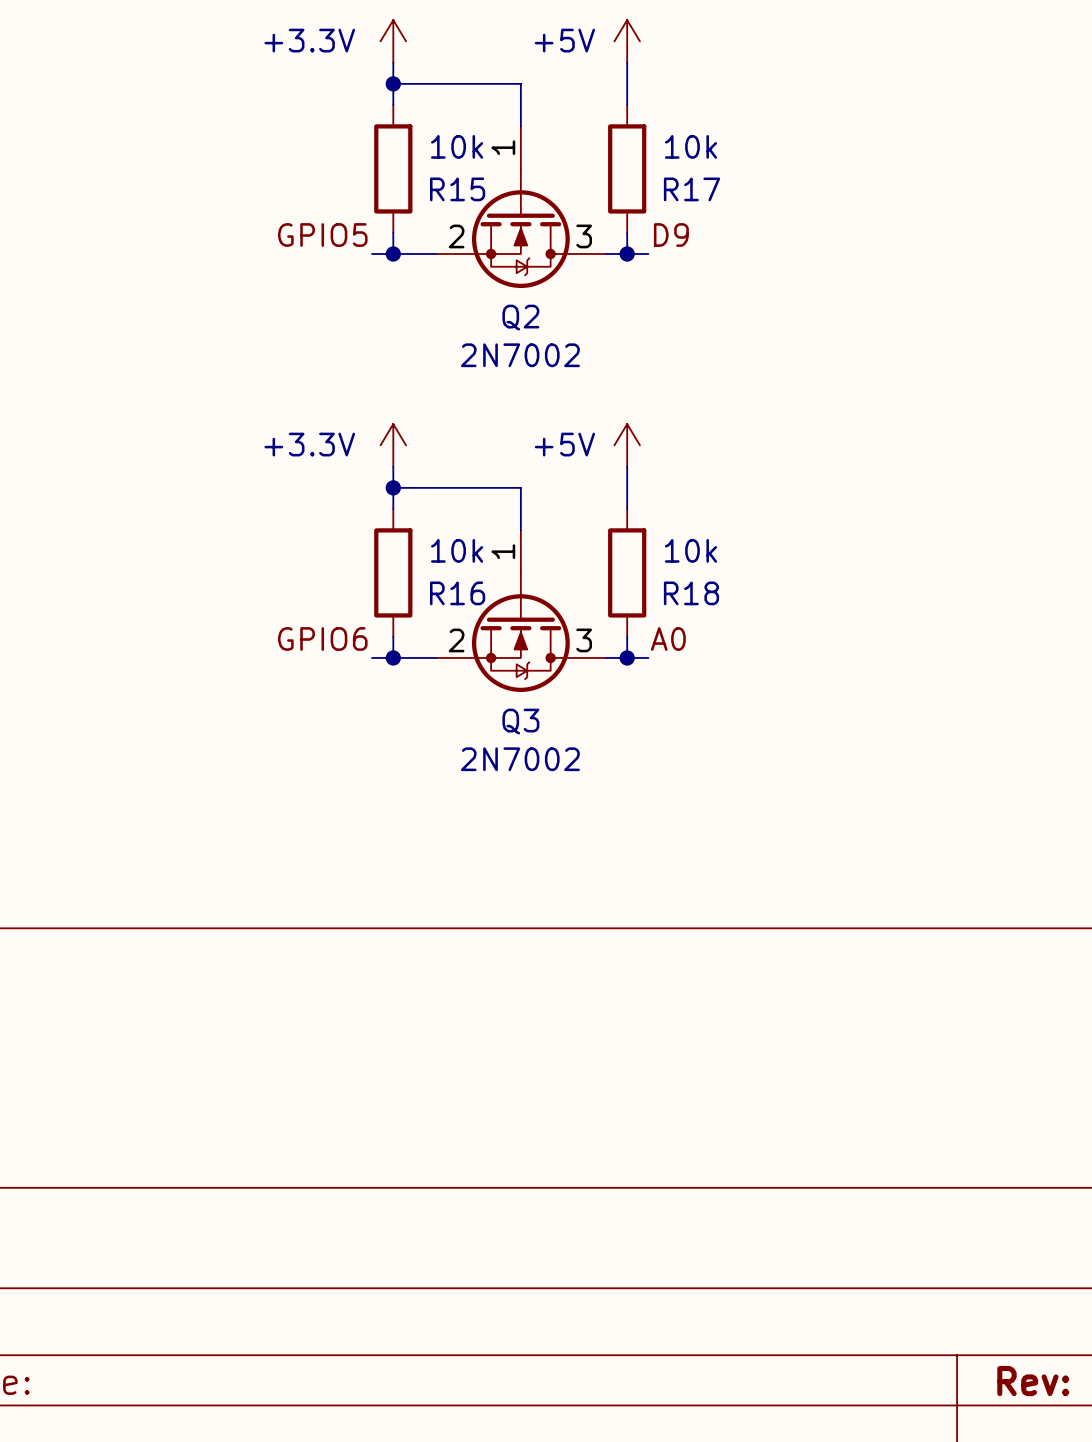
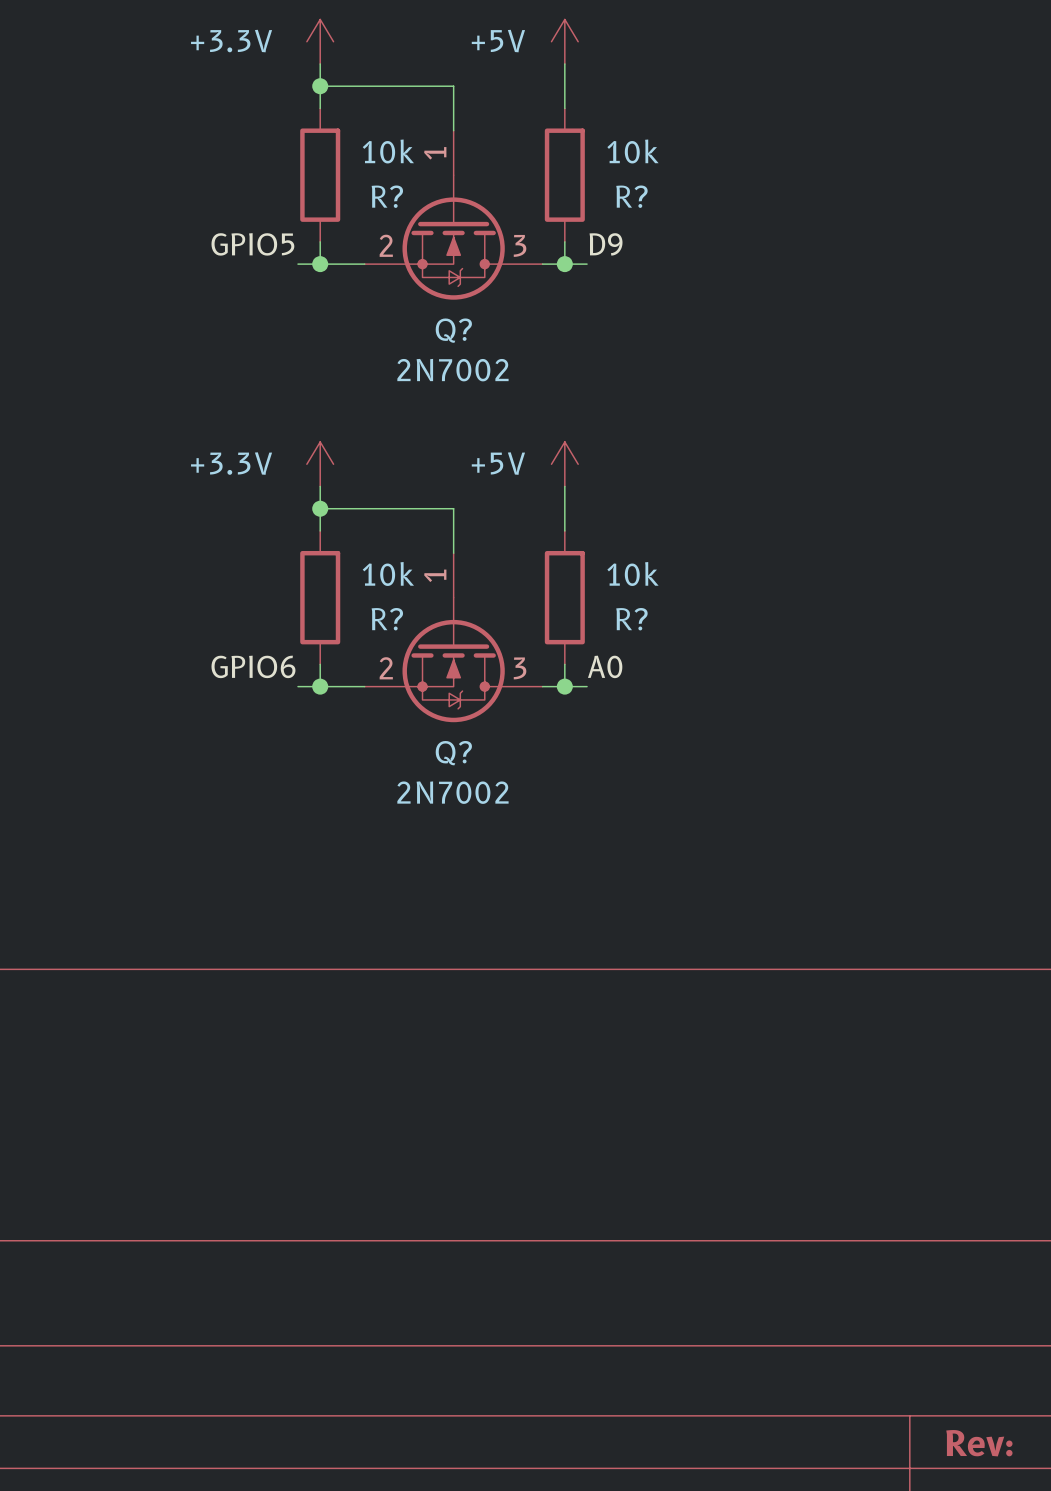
R15 name: R15 (457, 189) -> R? (387, 196)
R17 name: R17 (691, 189) -> R? (631, 196)
Q2 name: Q2 (520, 317) -> Q? (453, 330)
R16 name: R16 (457, 593) -> R? (387, 619)
R18 name: R18 (691, 593) -> R? (631, 619)
Q3 name: Q3 (520, 721) -> Q? (453, 753)

